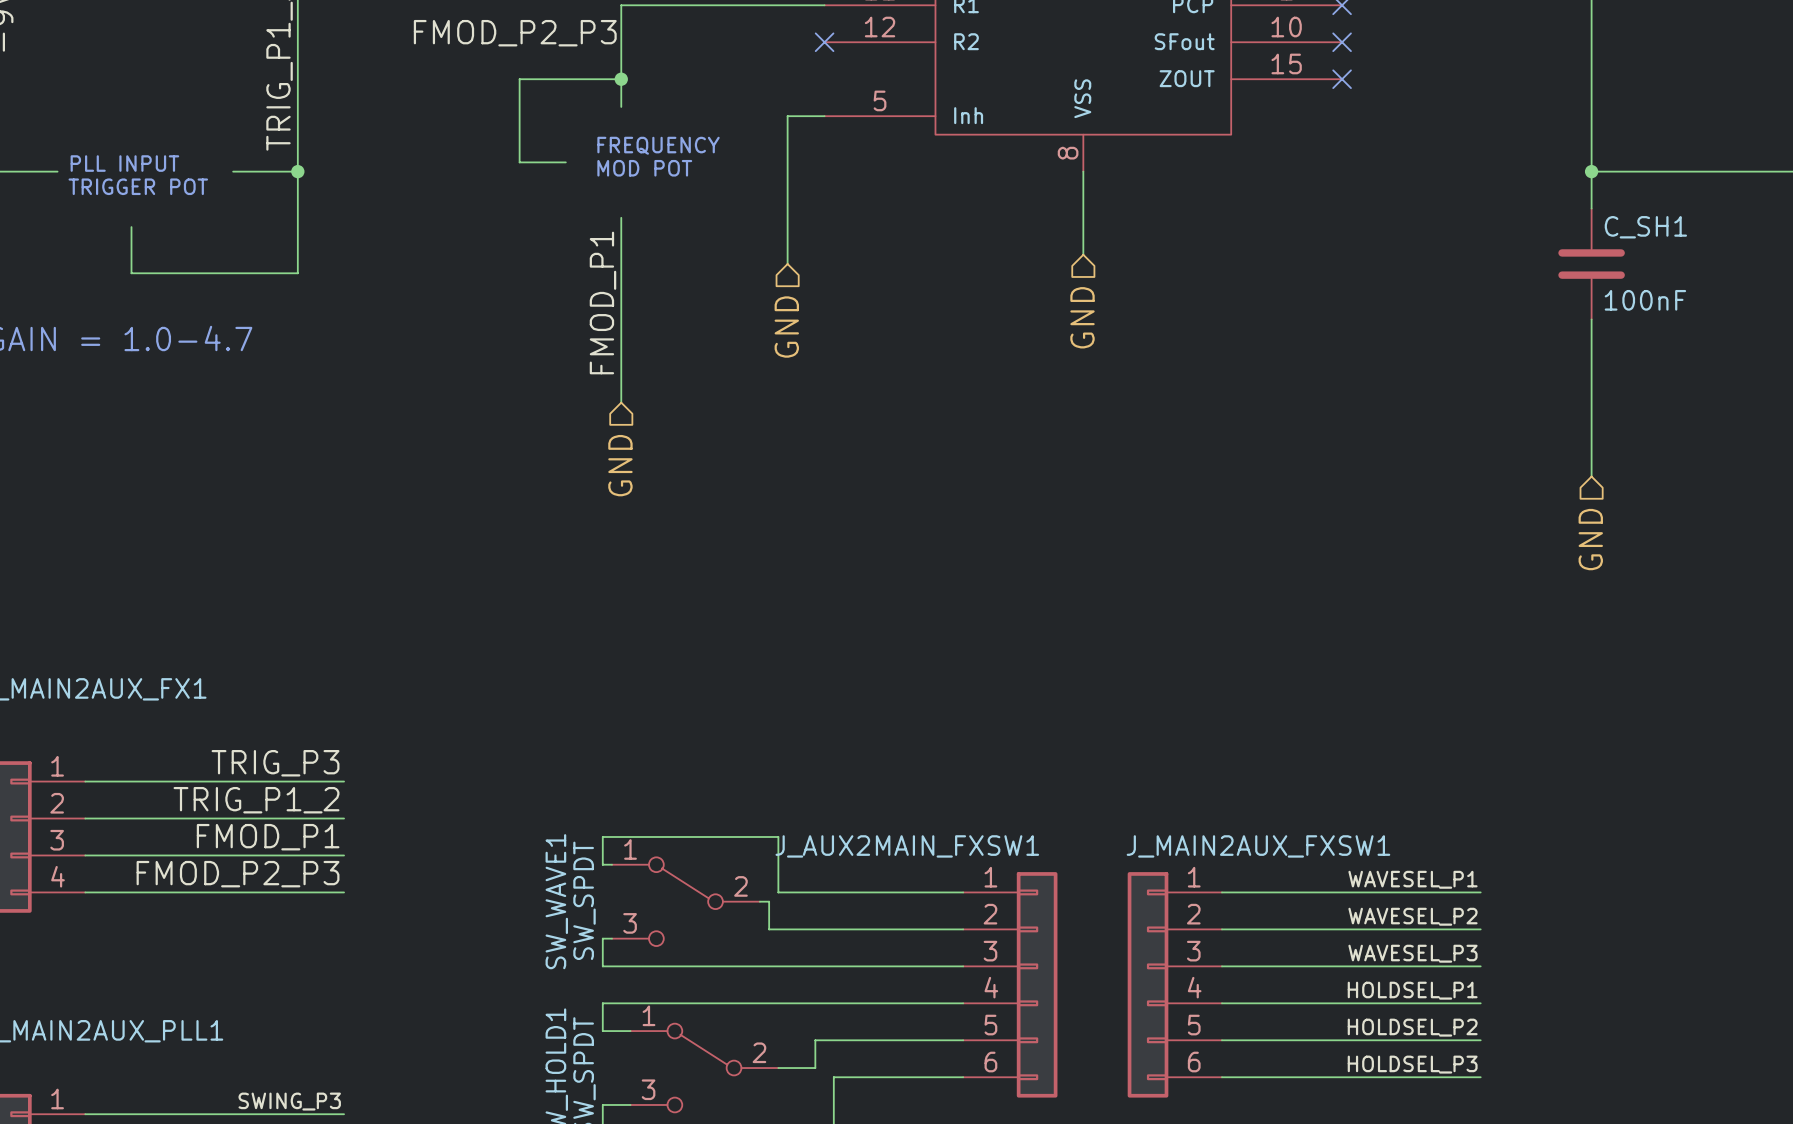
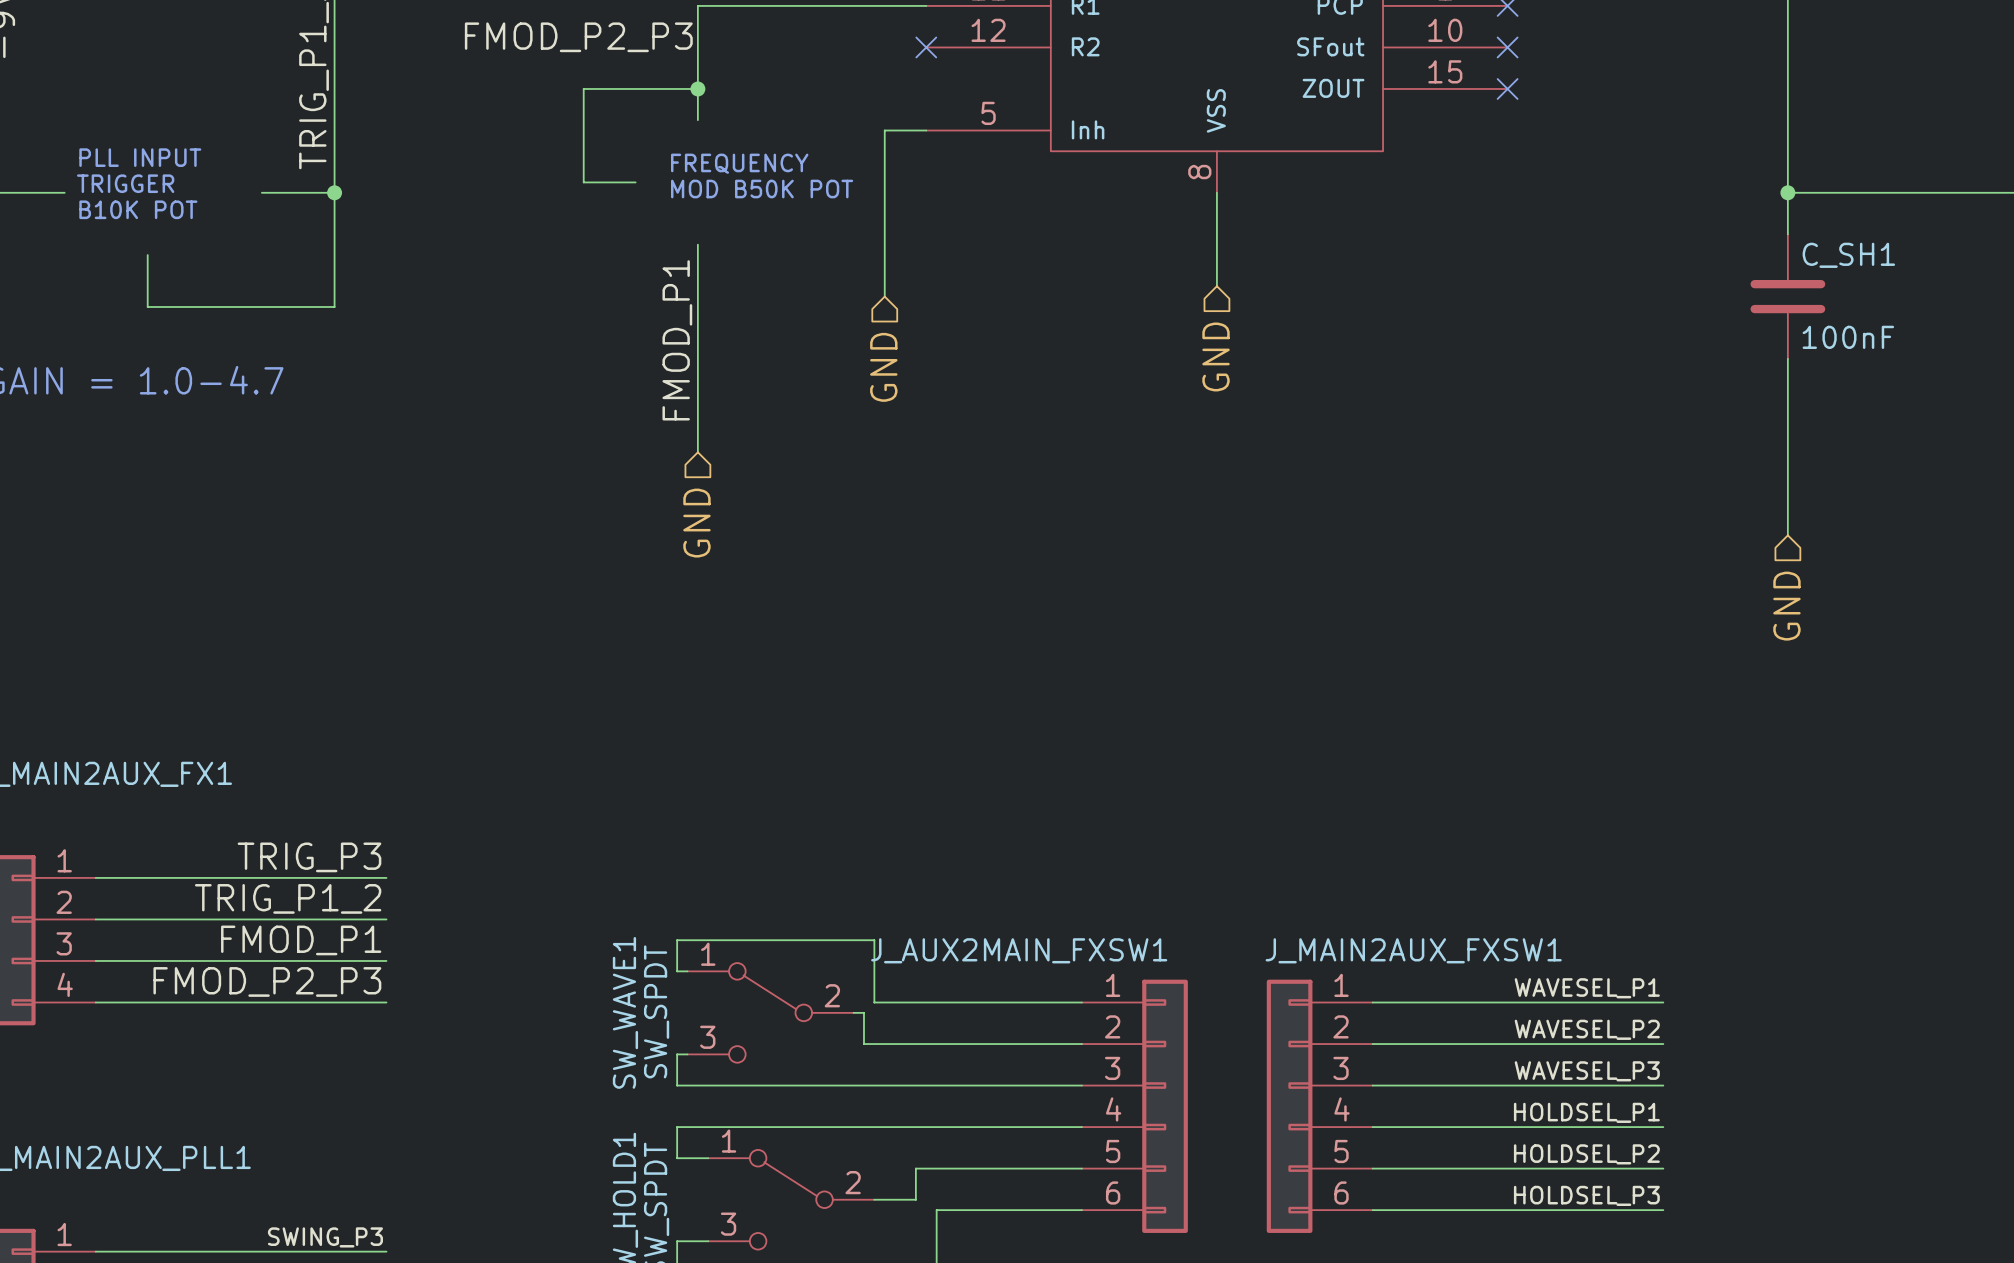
text: none -> PLL INPUT (140, 157)
text: PLL INPUT (124, 163) -> TRIGGER (125, 183)
text: MOD POT (644, 168) -> MOD B50K POT (762, 189)
text: TRIGGER POT (138, 186) -> B10K POT (138, 209)

